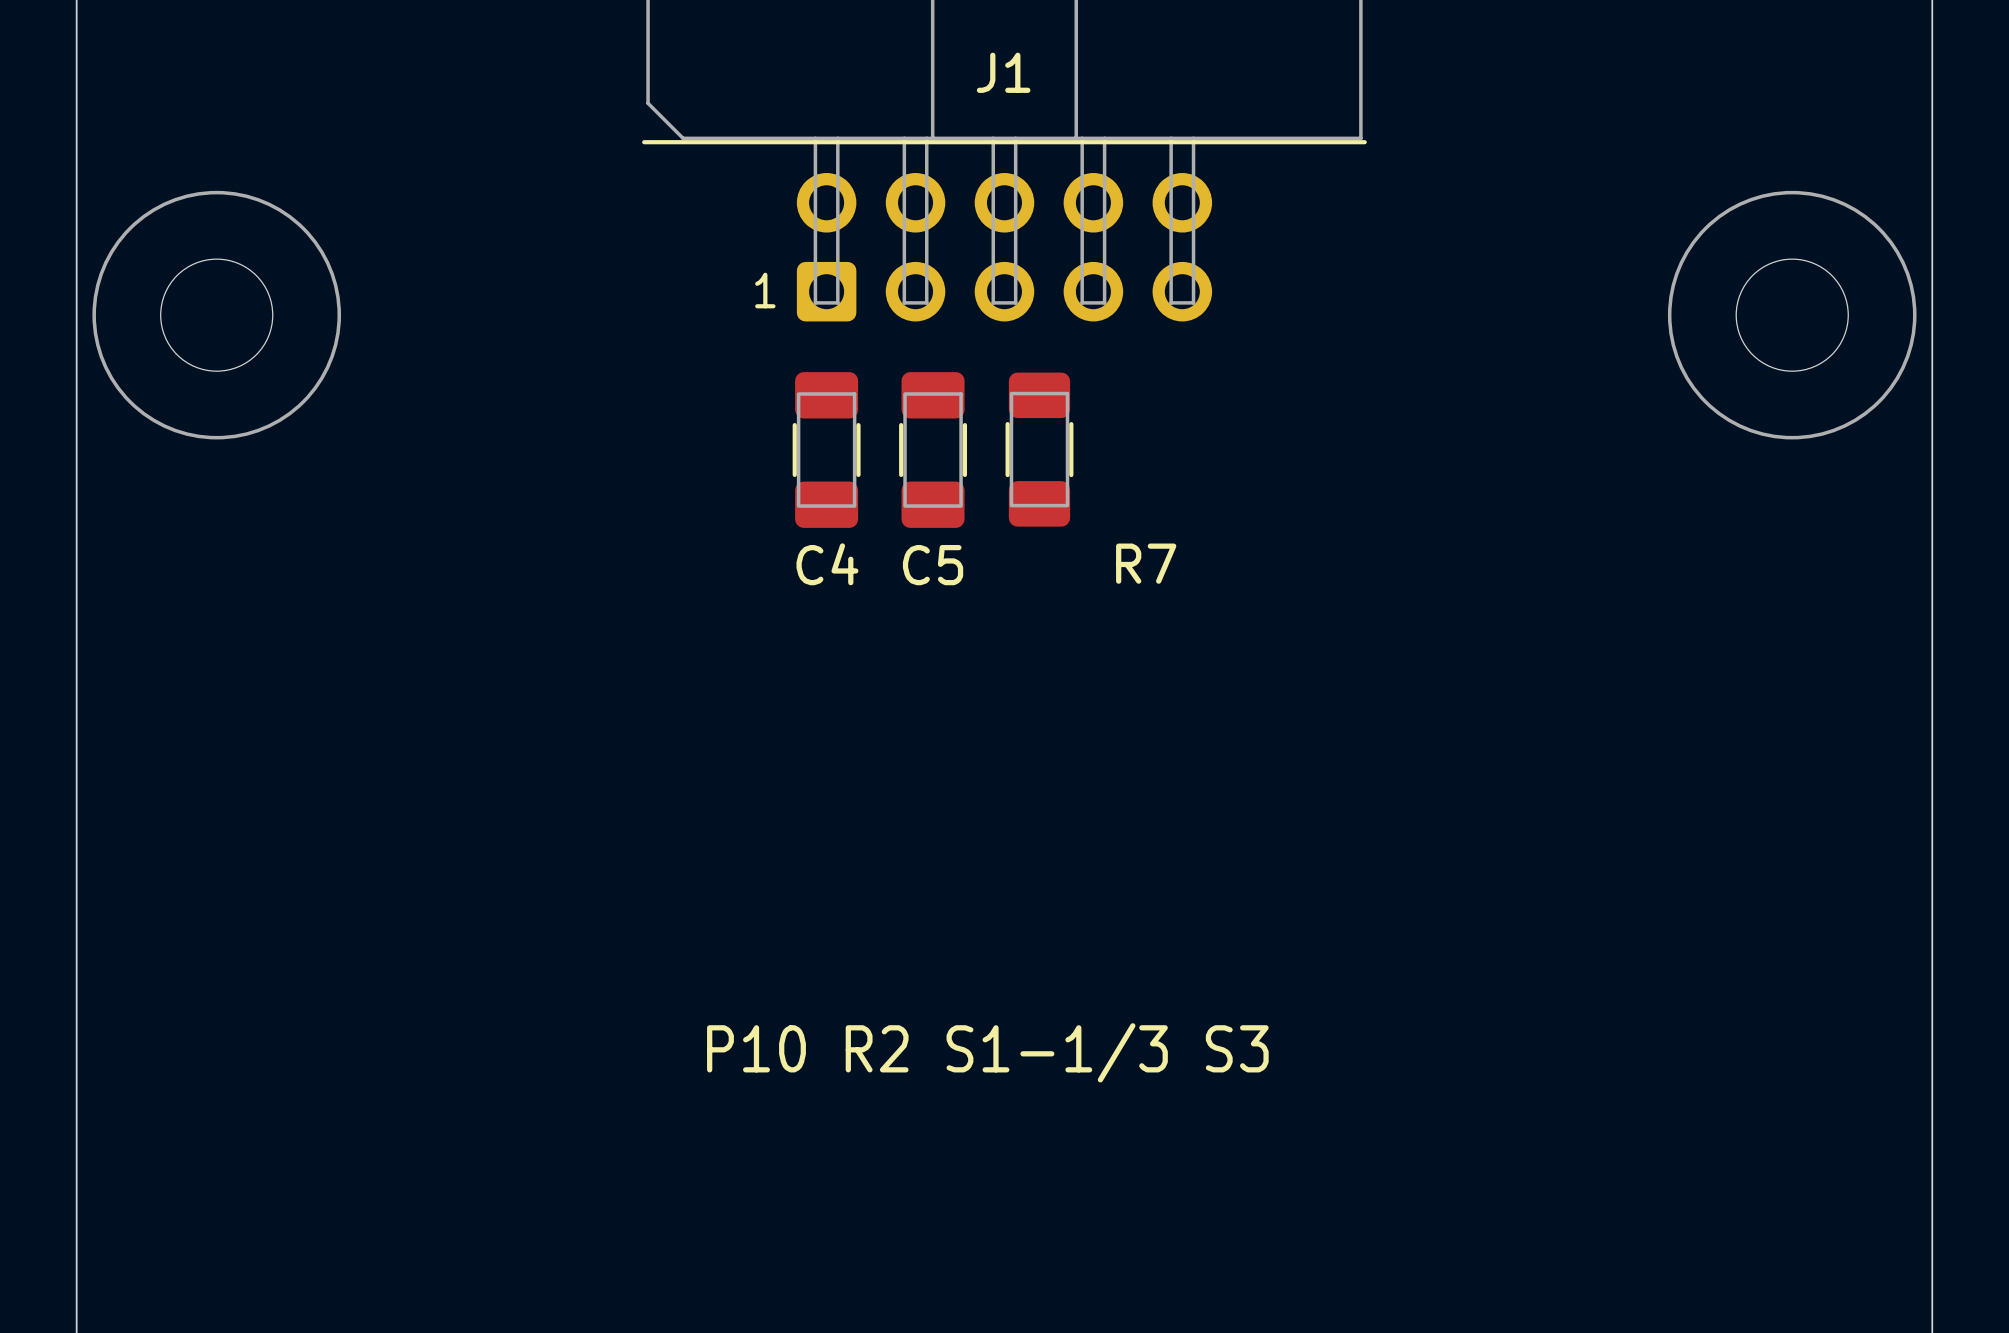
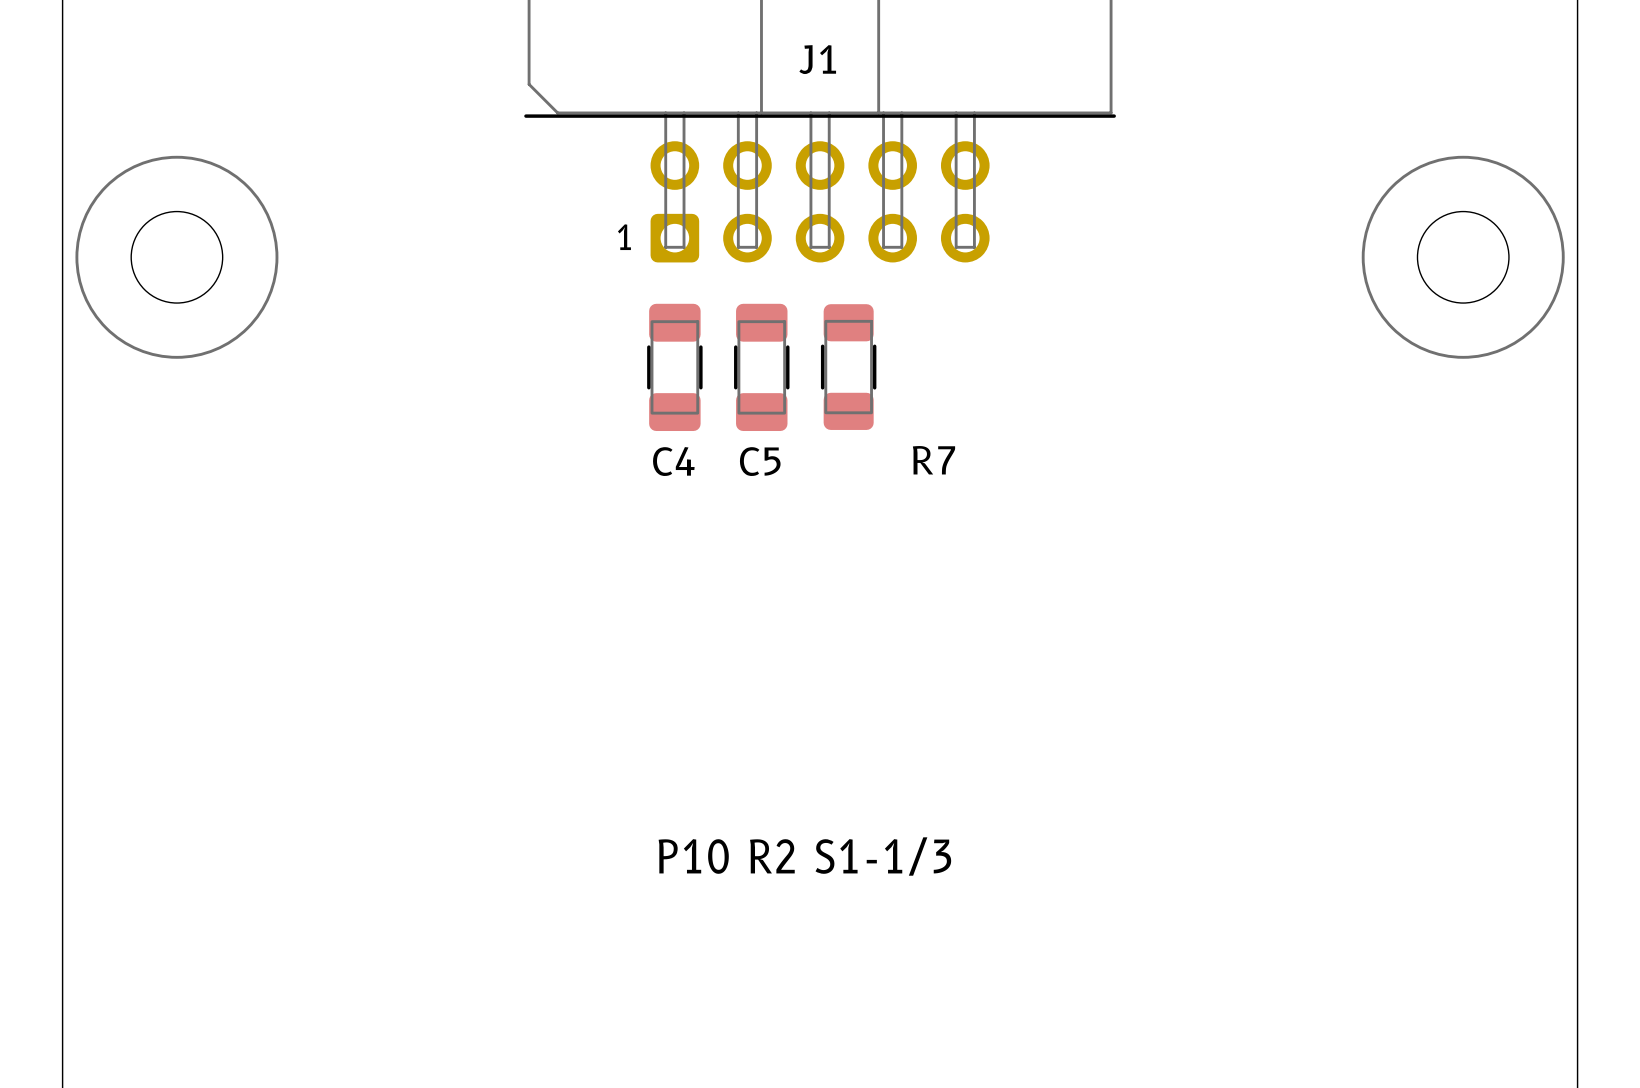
text: P10 R2 S1-1/3 S3 (987, 1052) -> P10 R2 S1-1/3 (804, 856)

